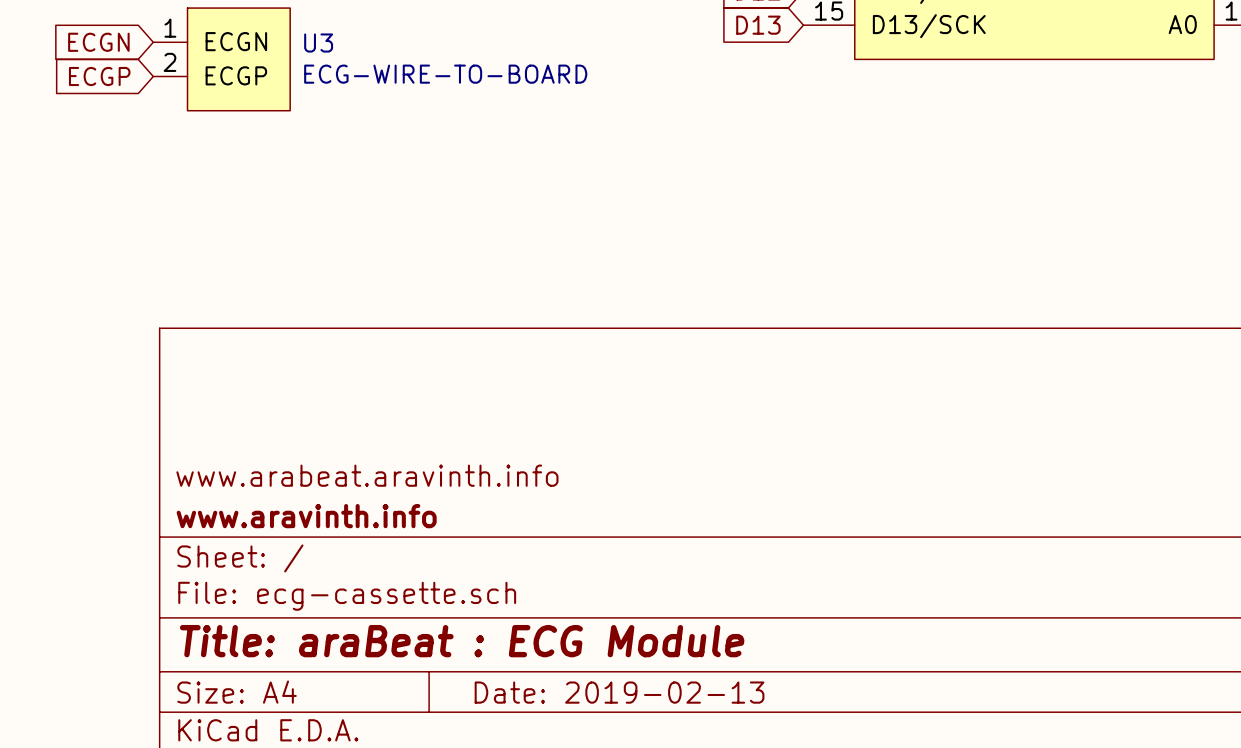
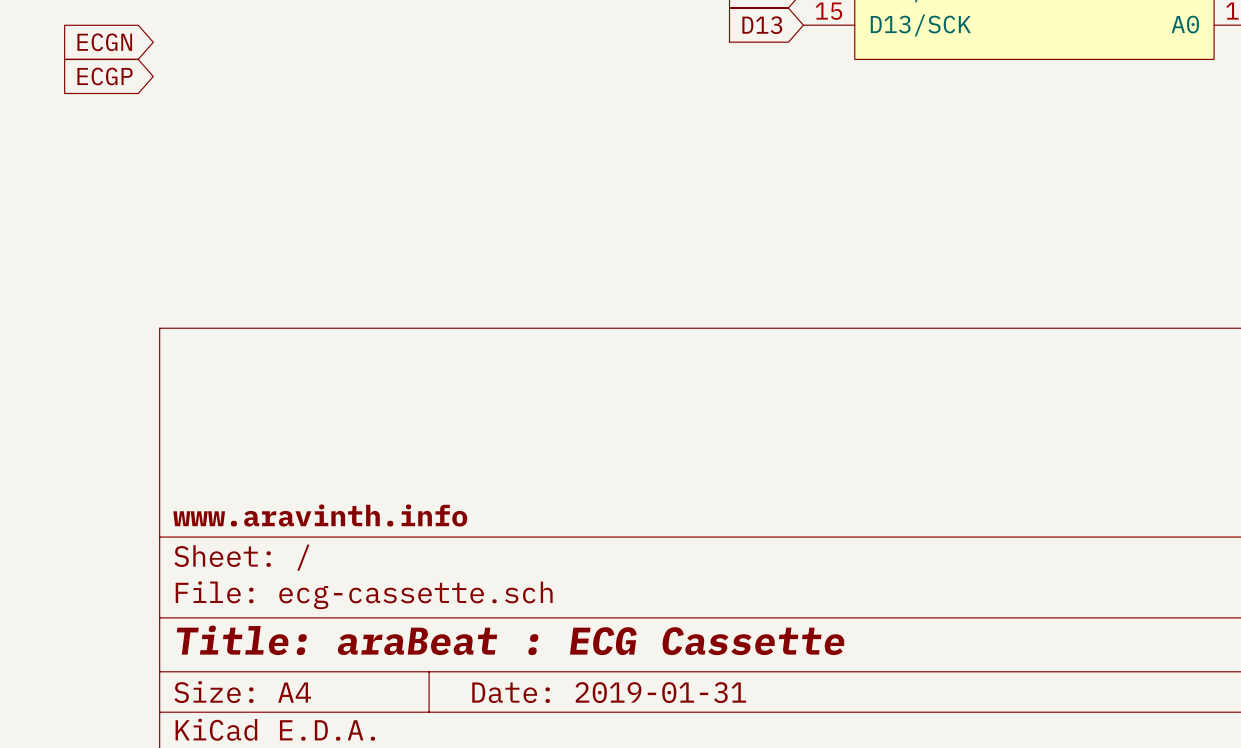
U3: ECG-WIRE-TO-BOARD (221, 59) -> none
title block: www.arabeat.aravinth.info (367, 475) -> none
title block: Title: araBeat : ECG Module (462, 641) -> Title: araBeat : ECG Cassette (510, 640)
title block: Date: 2019-02-13 (619, 692) -> Date: 2019-01-31 (609, 692)

